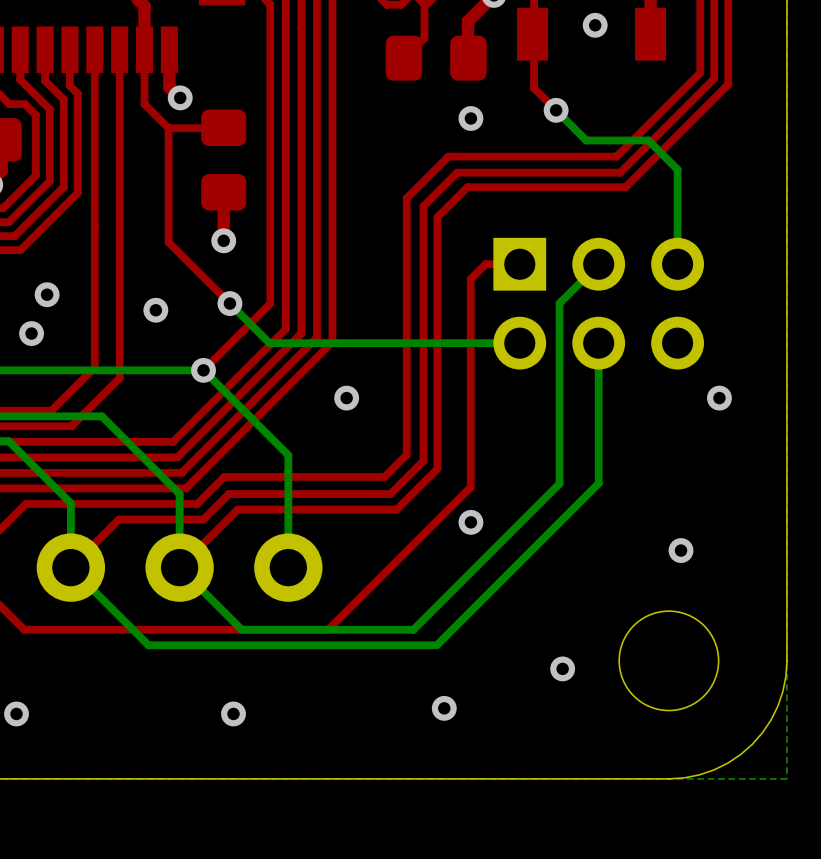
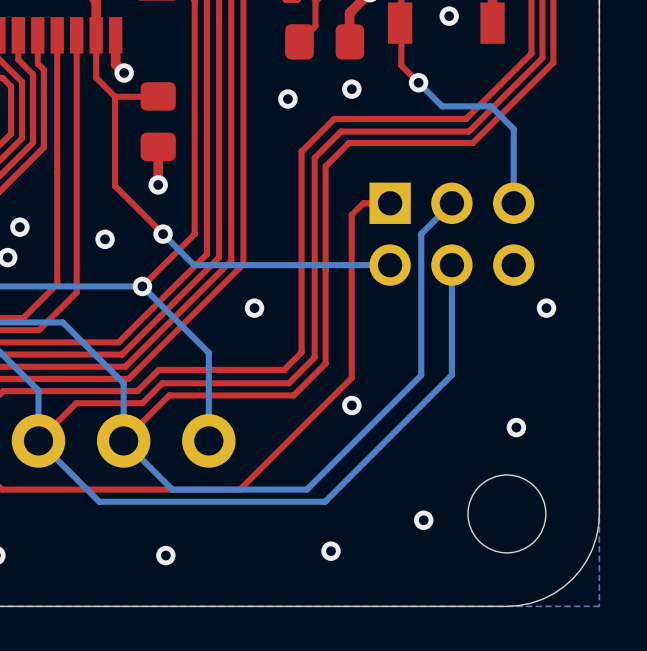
via: none -> (287, 99)

